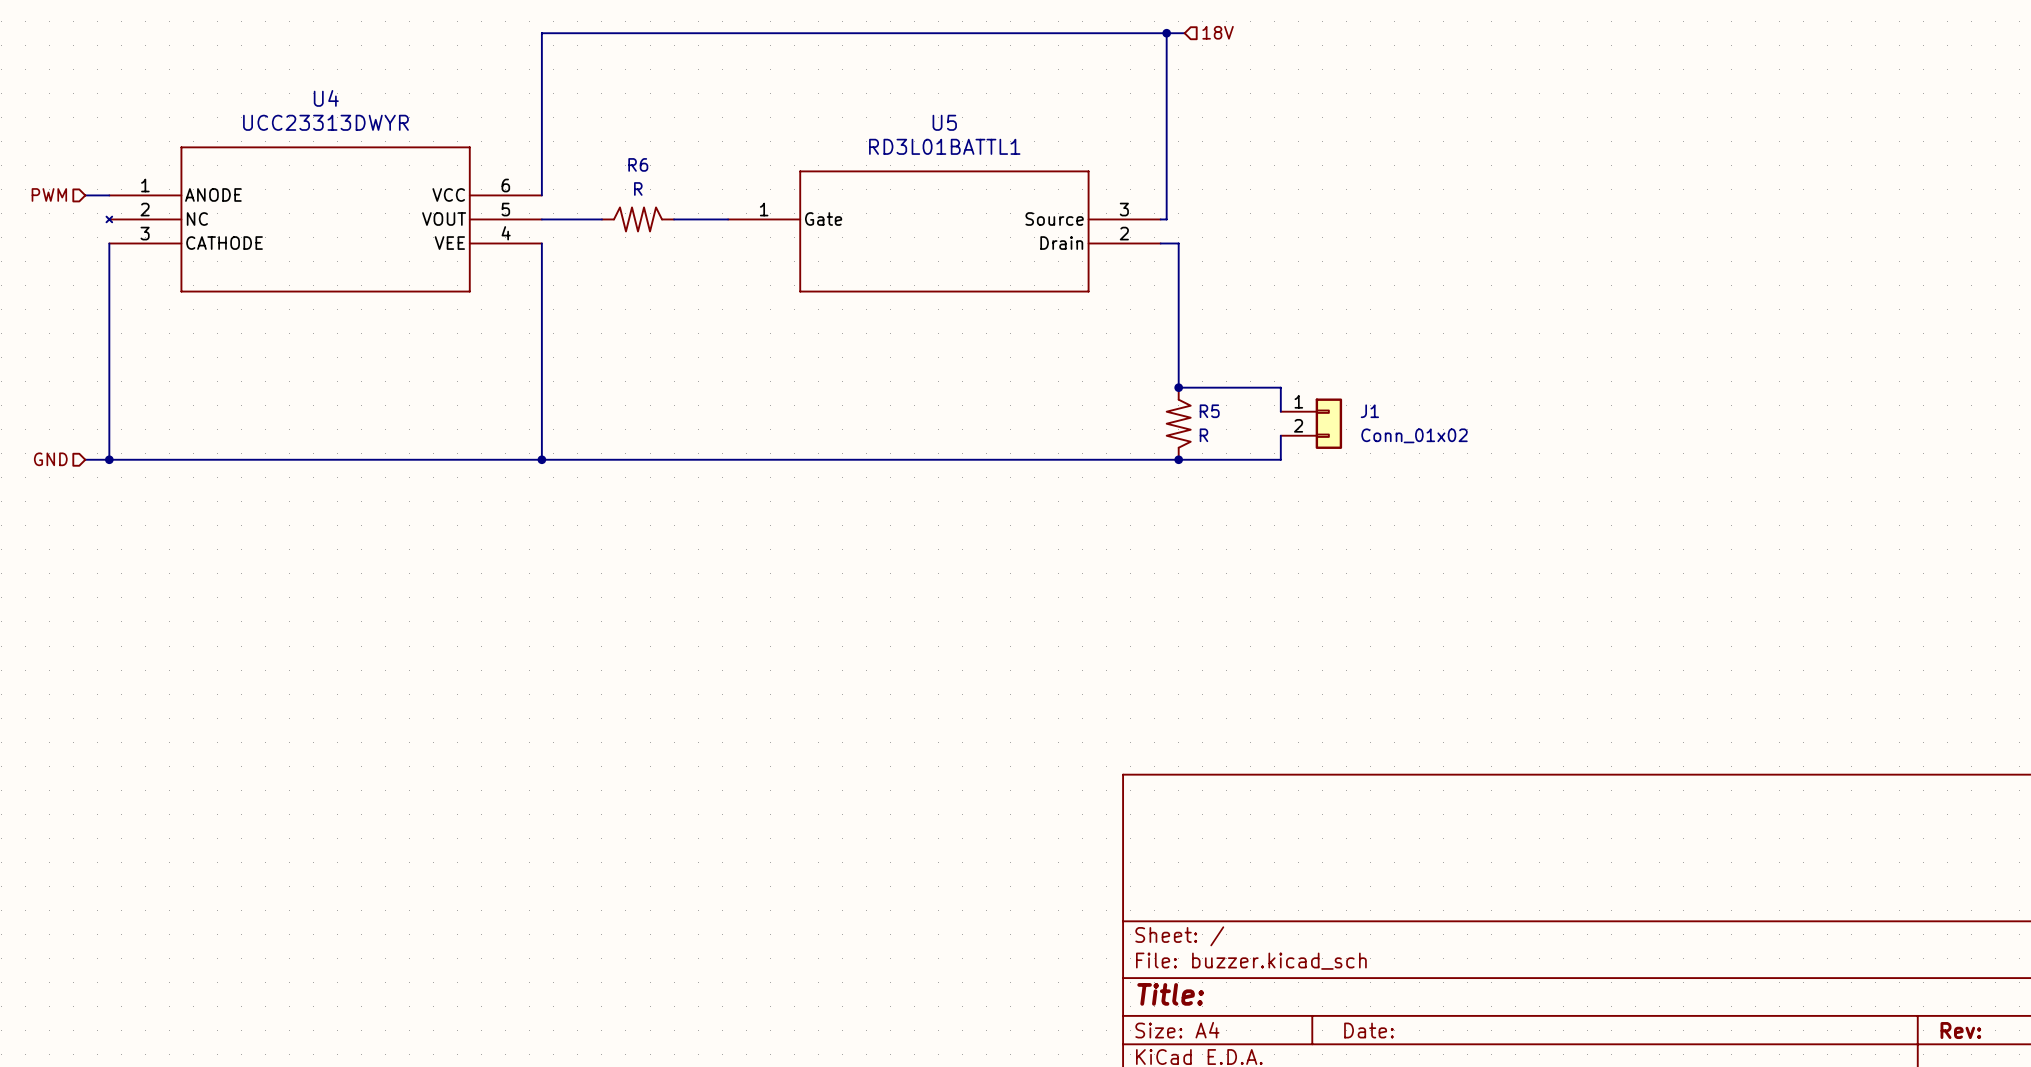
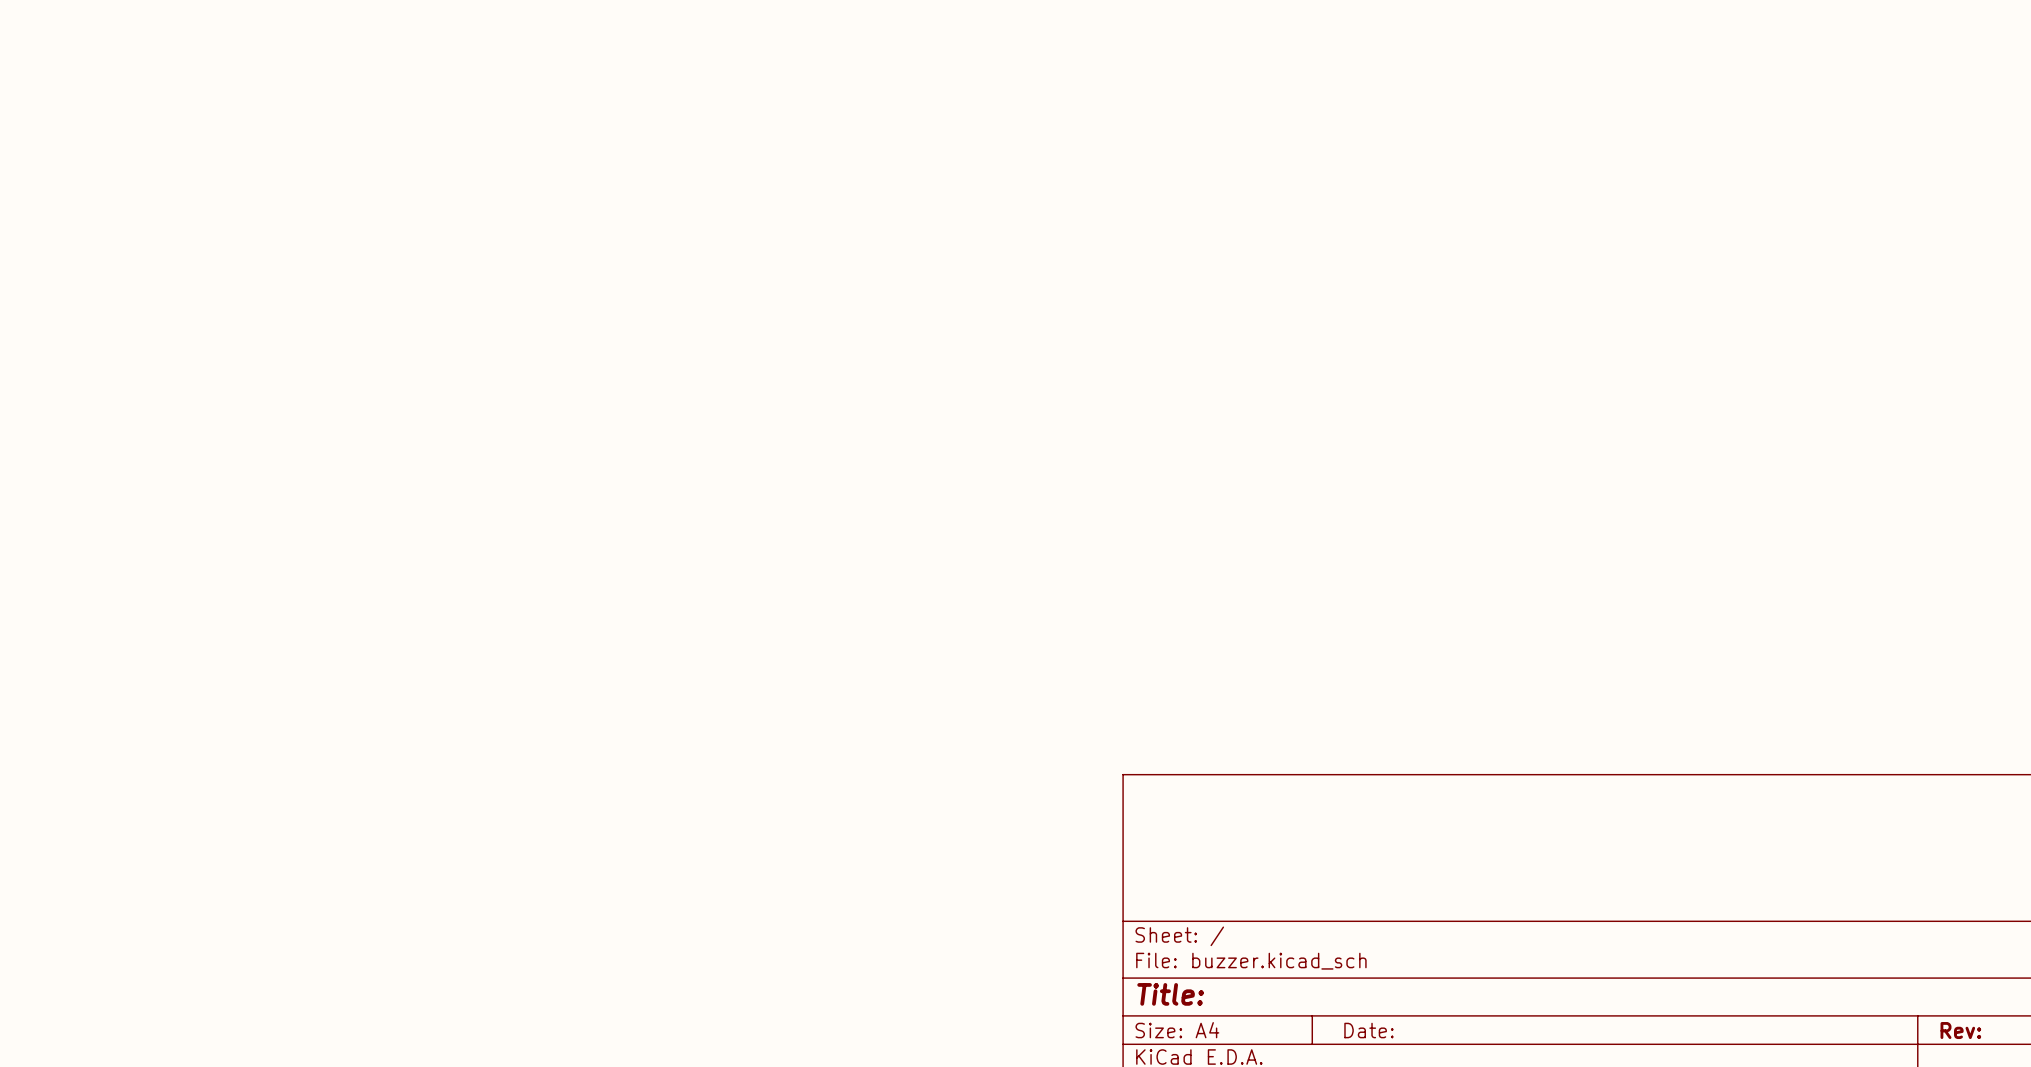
hierarchical label: 18V (1218, 32) -> none
wire: (1166, 33) (1166, 219) (1160, 219) -> none
junction: (1166, 33) -> none
wire: (1184, 33) (541, 33) (541, 195) -> none
hierarchical label: PWM (49, 194) -> none
wire: (85, 195) (109, 195) -> none
U4: UCC23313DWYR (324, 219) -> none
wire: (541, 219) (601, 219) -> none
R6: R (638, 219) -> none
wire: (674, 219) (728, 219) -> none
U5: RD3L01BATTL1 (944, 231) -> none
wire: (109, 243) (109, 459) -> none
wire: (541, 243) (541, 459) -> none
wire: (1160, 243) (1178, 243) (1178, 387) (1280, 387) (1280, 411) -> none
junction: (1178, 387) -> none
R5: R (1178, 423) -> none
J1: Conn_01x02 (1311, 423) -> none
wire: (1280, 435) (1280, 459) (85, 459) -> none
hierarchical label: GND (50, 459) -> none
junction: (109, 459) -> none
junction: (541, 459) -> none
junction: (1178, 459) -> none

